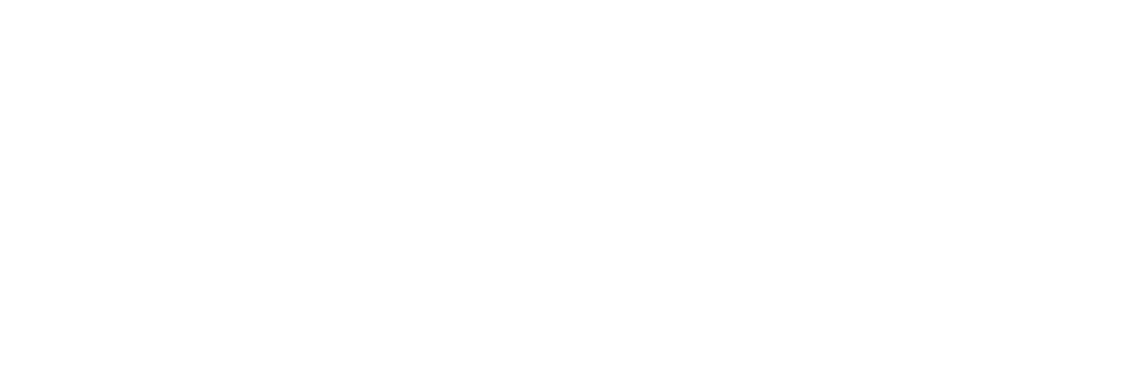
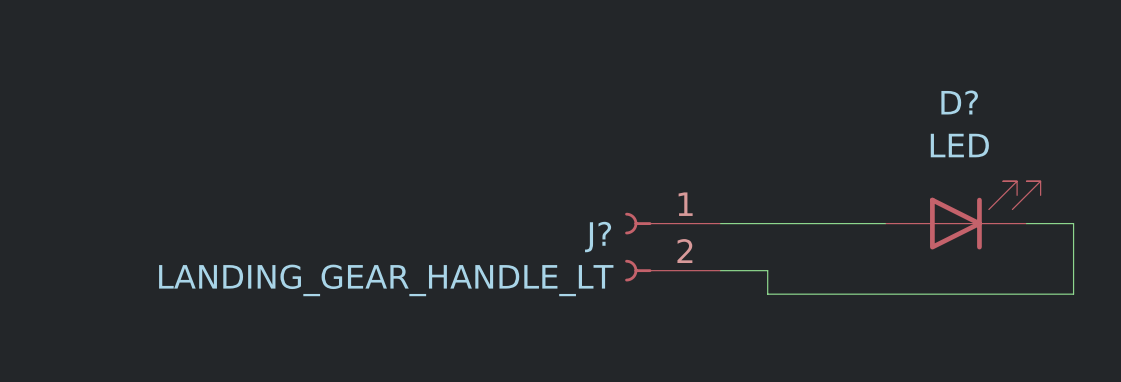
D?: none -> LED (962, 215)
wire: none -> (720, 223) (885, 223)
wire: none -> (1026, 223) (1073, 223) (1073, 294) (767, 294) (767, 270) (720, 270)
J?: none -> LANDING_GEAR_HANDLE_LT (672, 247)

